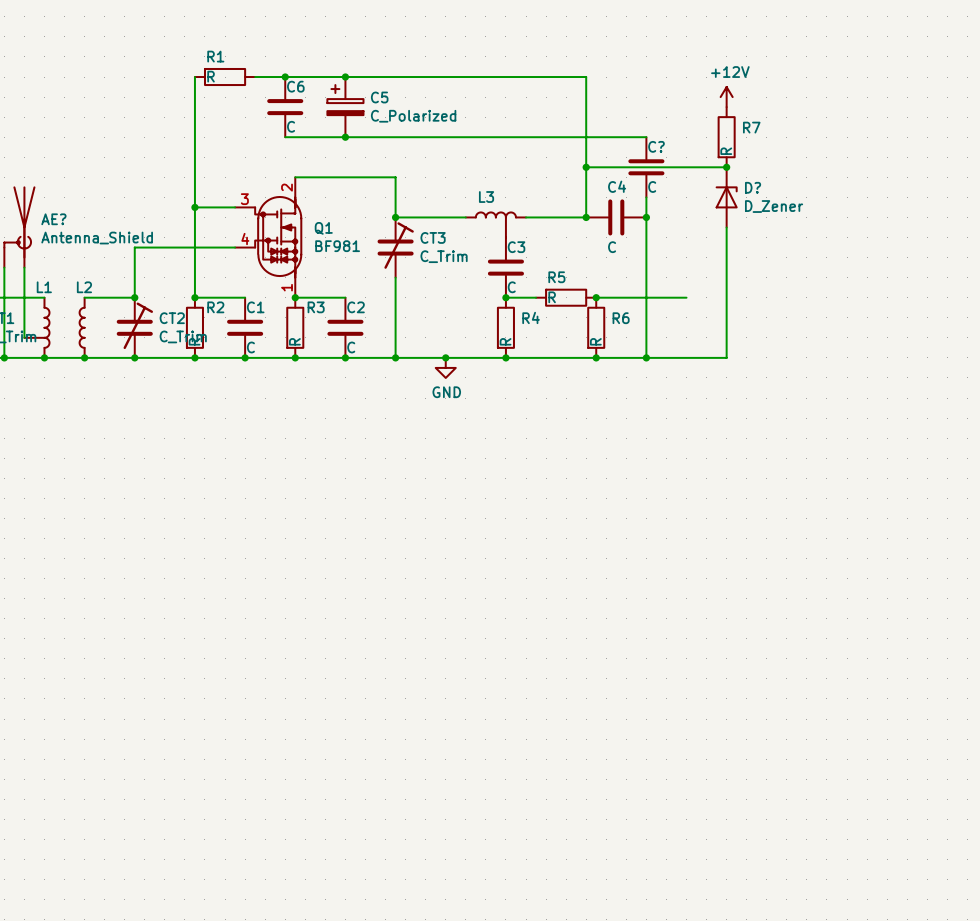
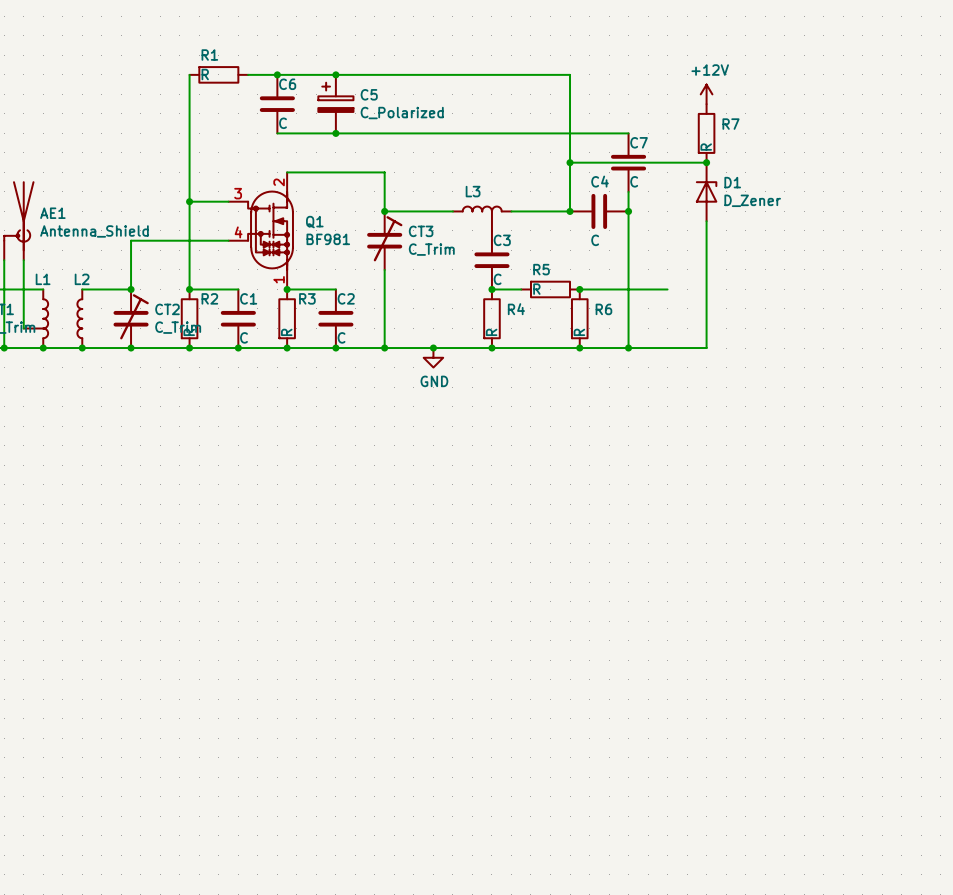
C? name: C? (656, 146) -> C7 (639, 142)
D? name: D? (753, 187) -> D1 (732, 182)
AE? name: AE? (53, 219) -> AE1 (52, 213)

